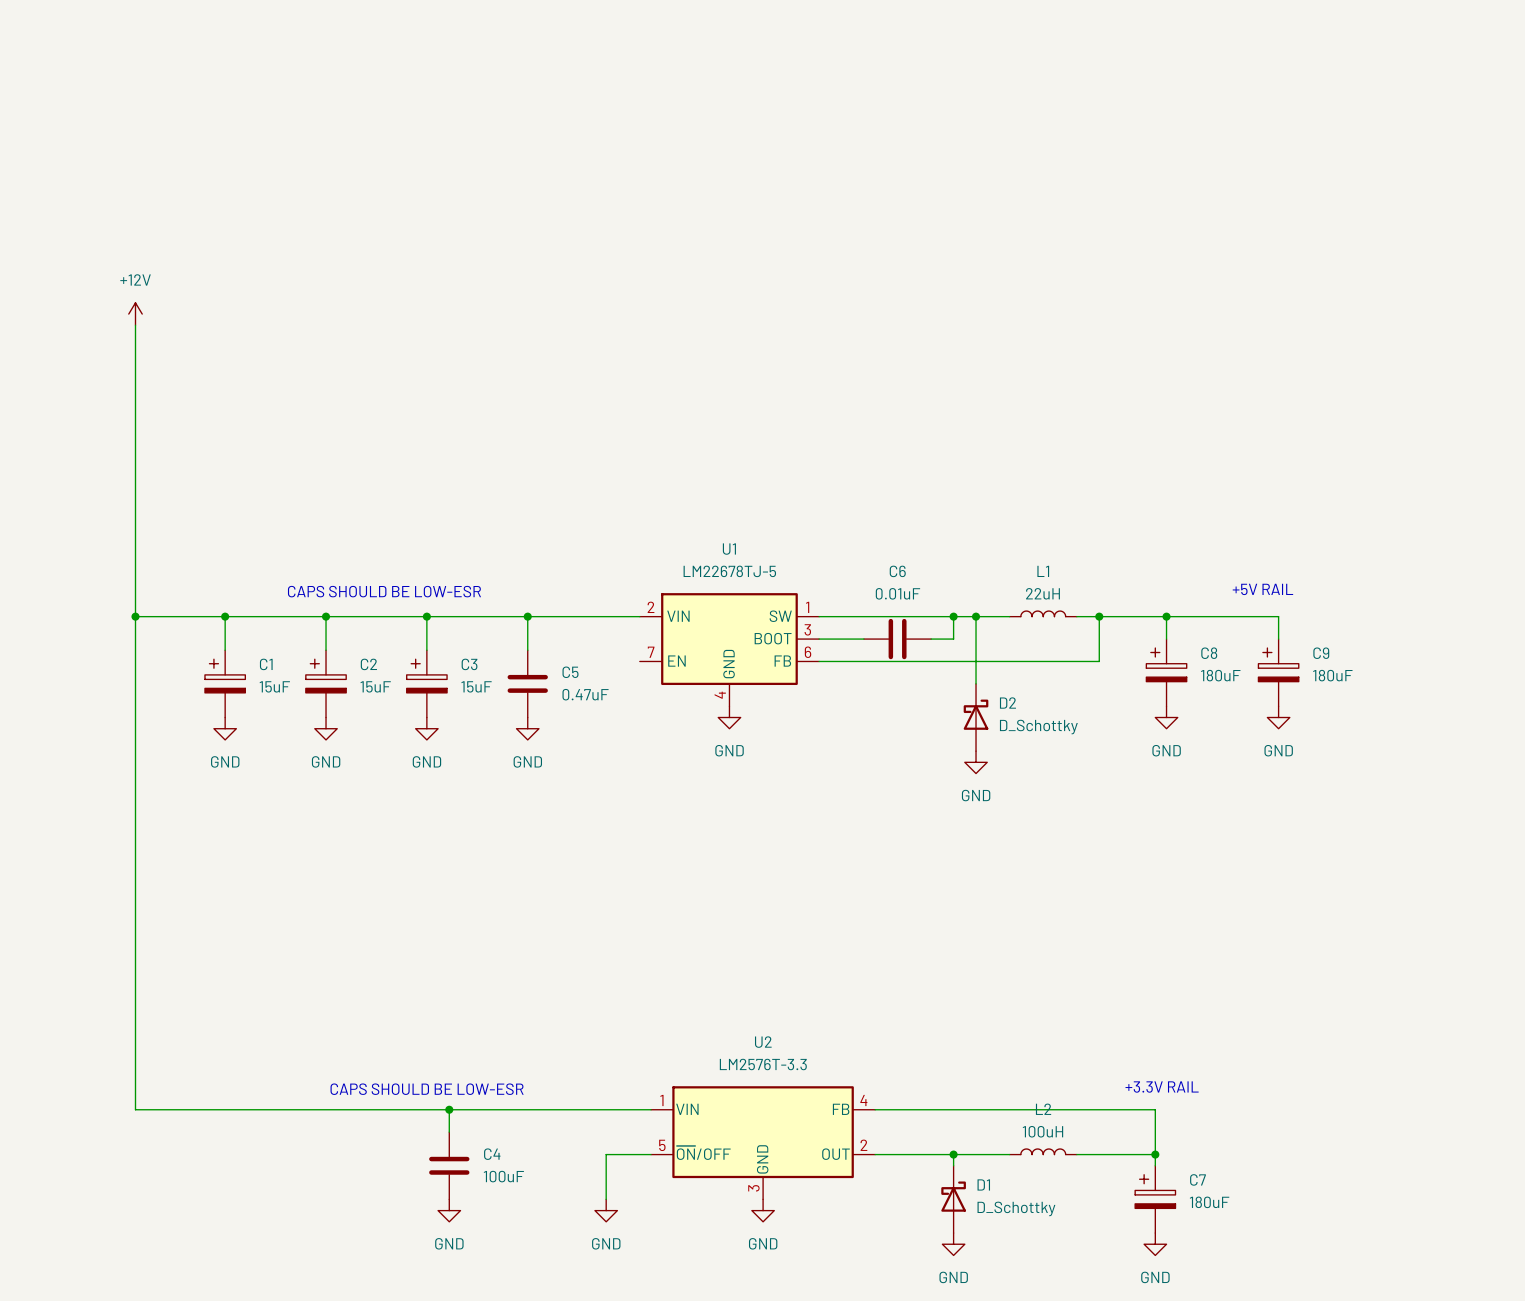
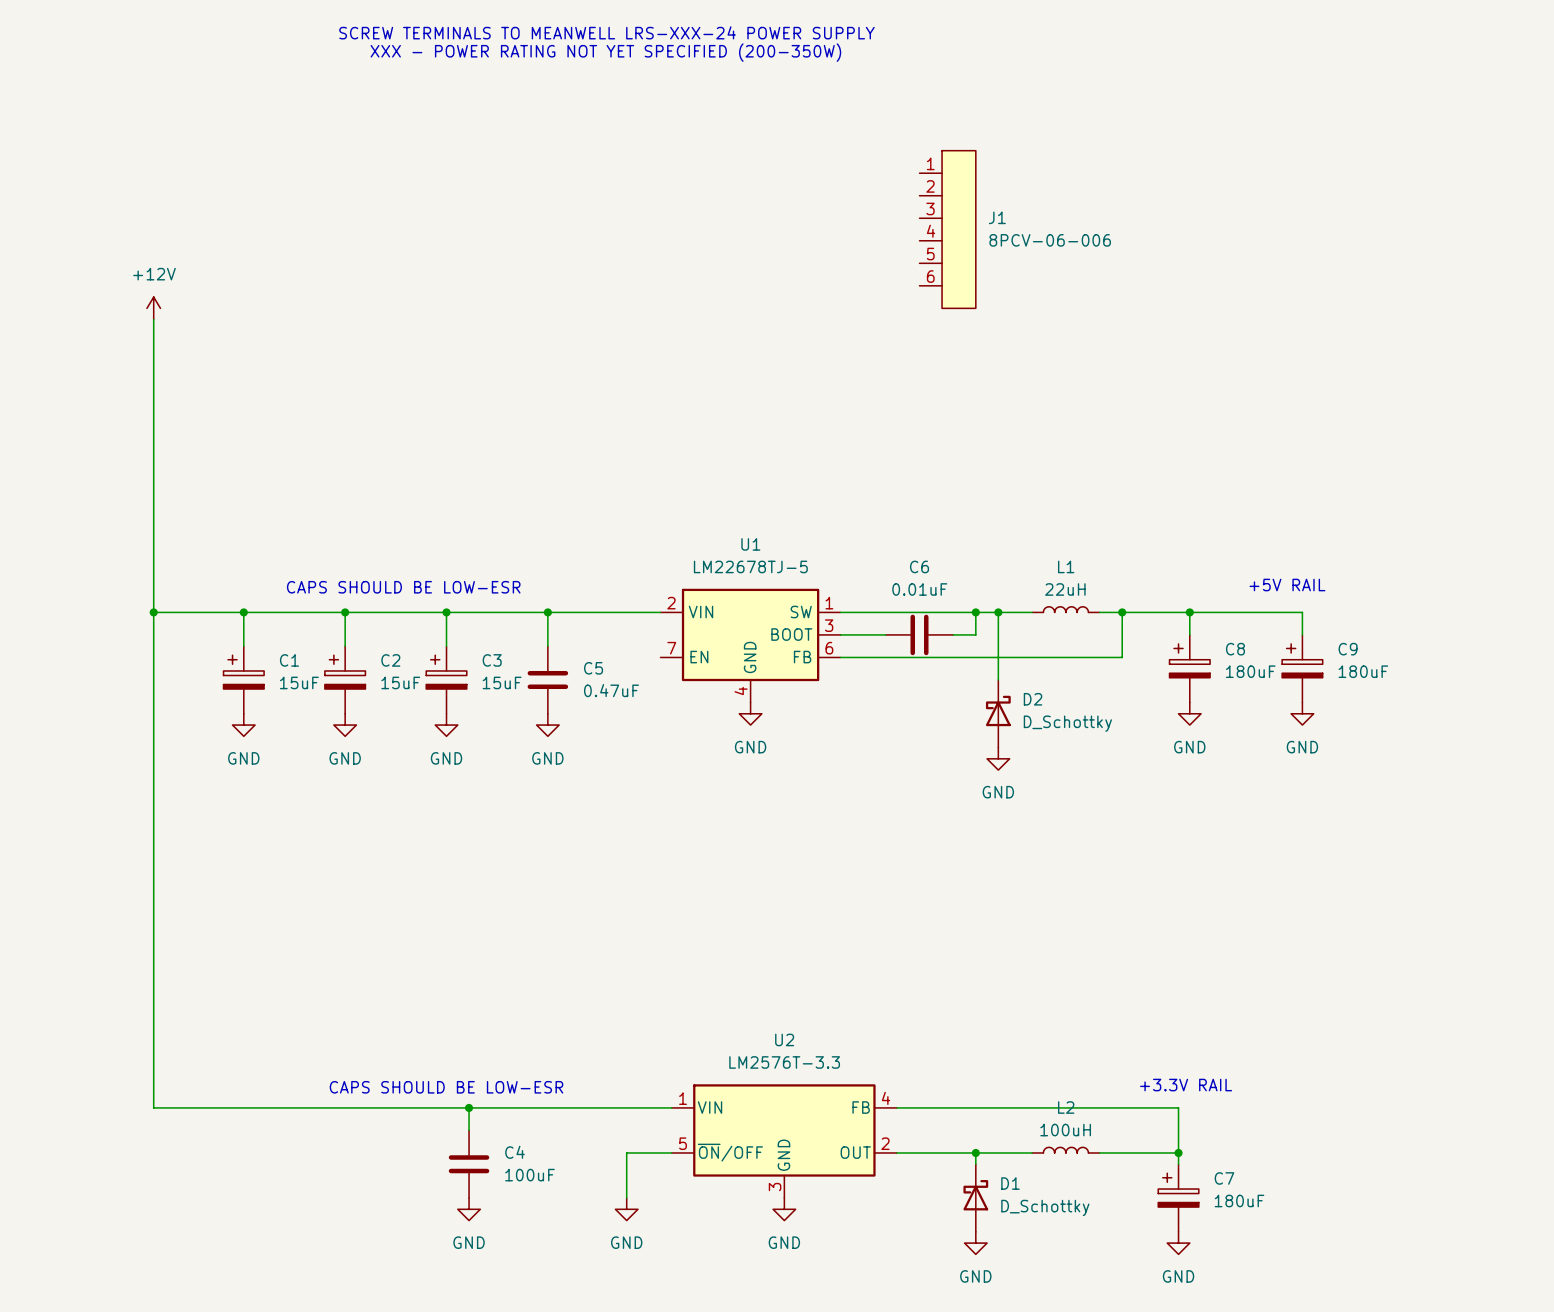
text: none -> SCREW TERMINALS TO MEANWELL LRS-XXX-24 POWER SUPPLY (606, 32)
text: none -> XXX - POWER RATING NOT YET SPECIFIED (200-350W) (605, 52)
J1: none -> 8PCV-06-006 (947, 229)

